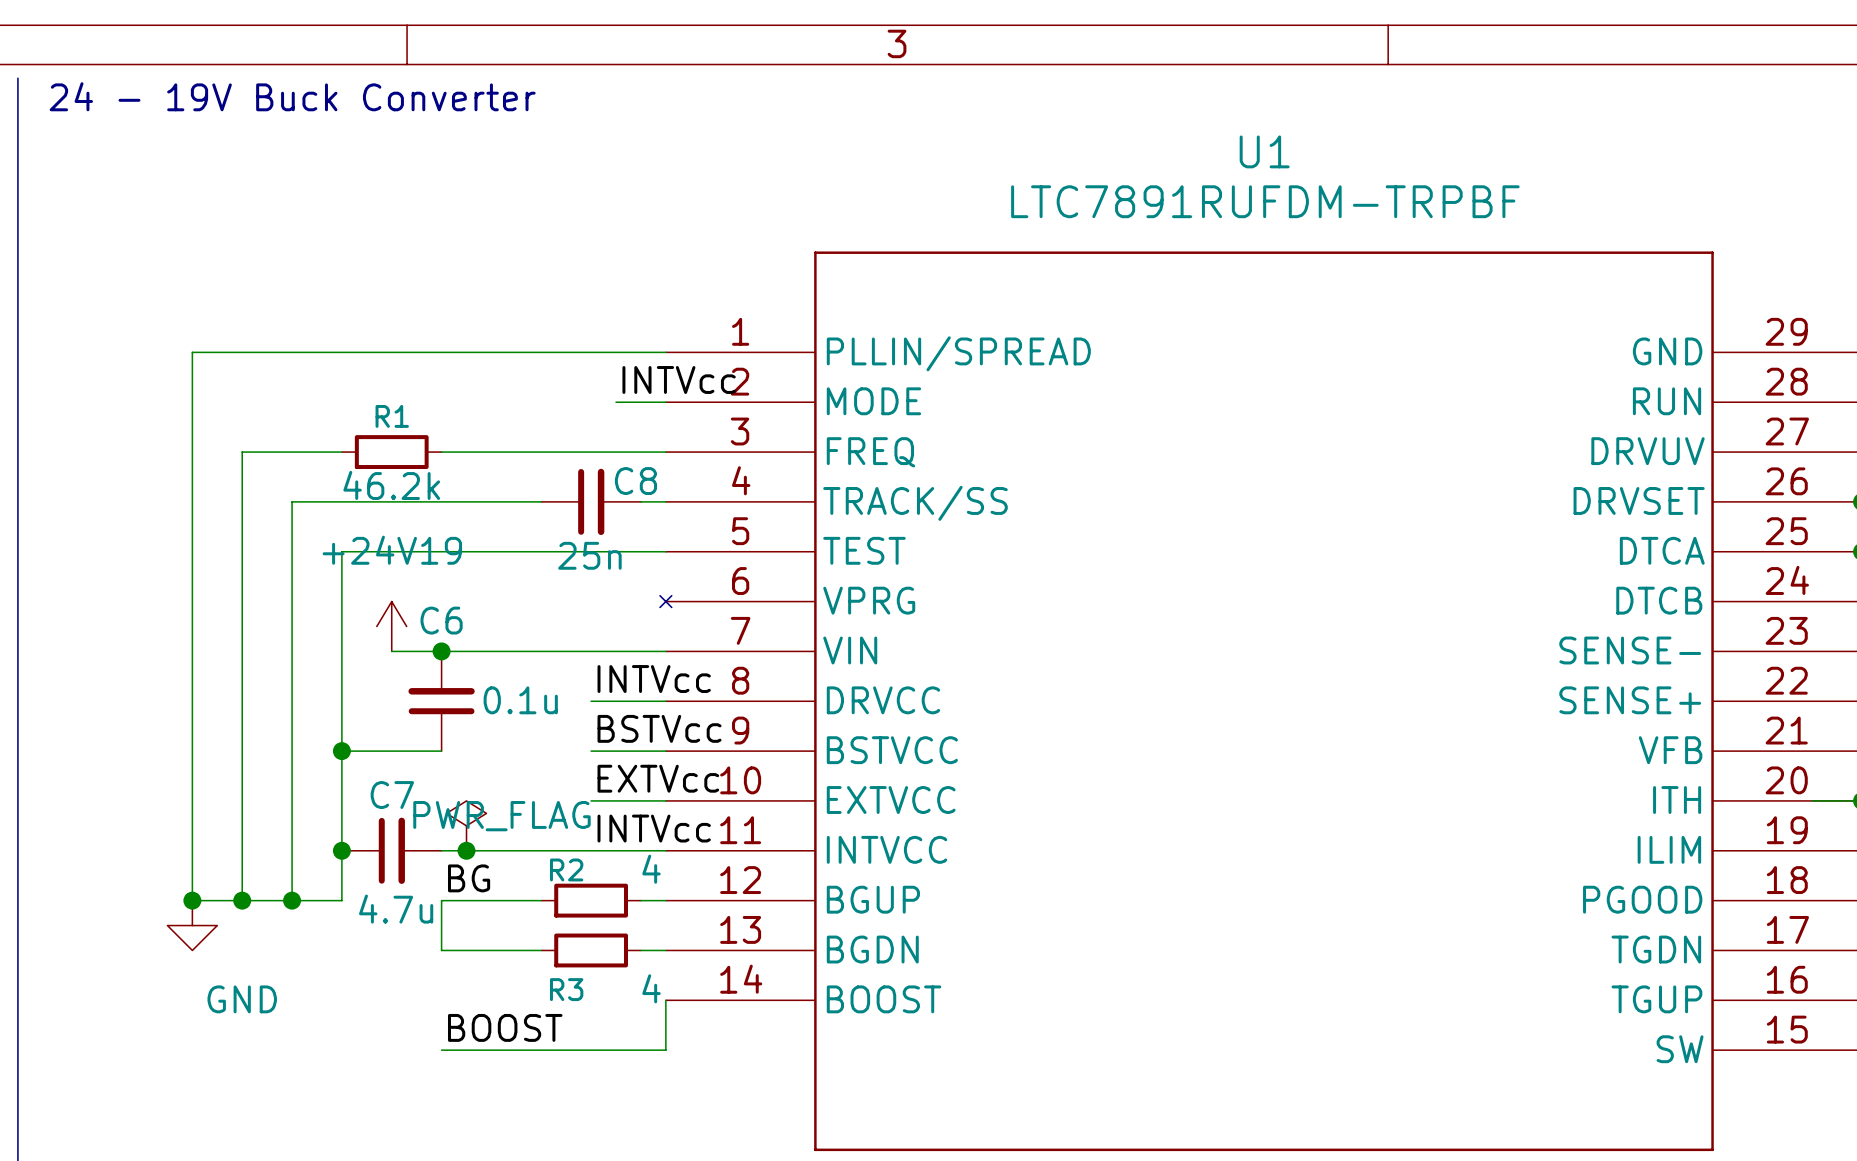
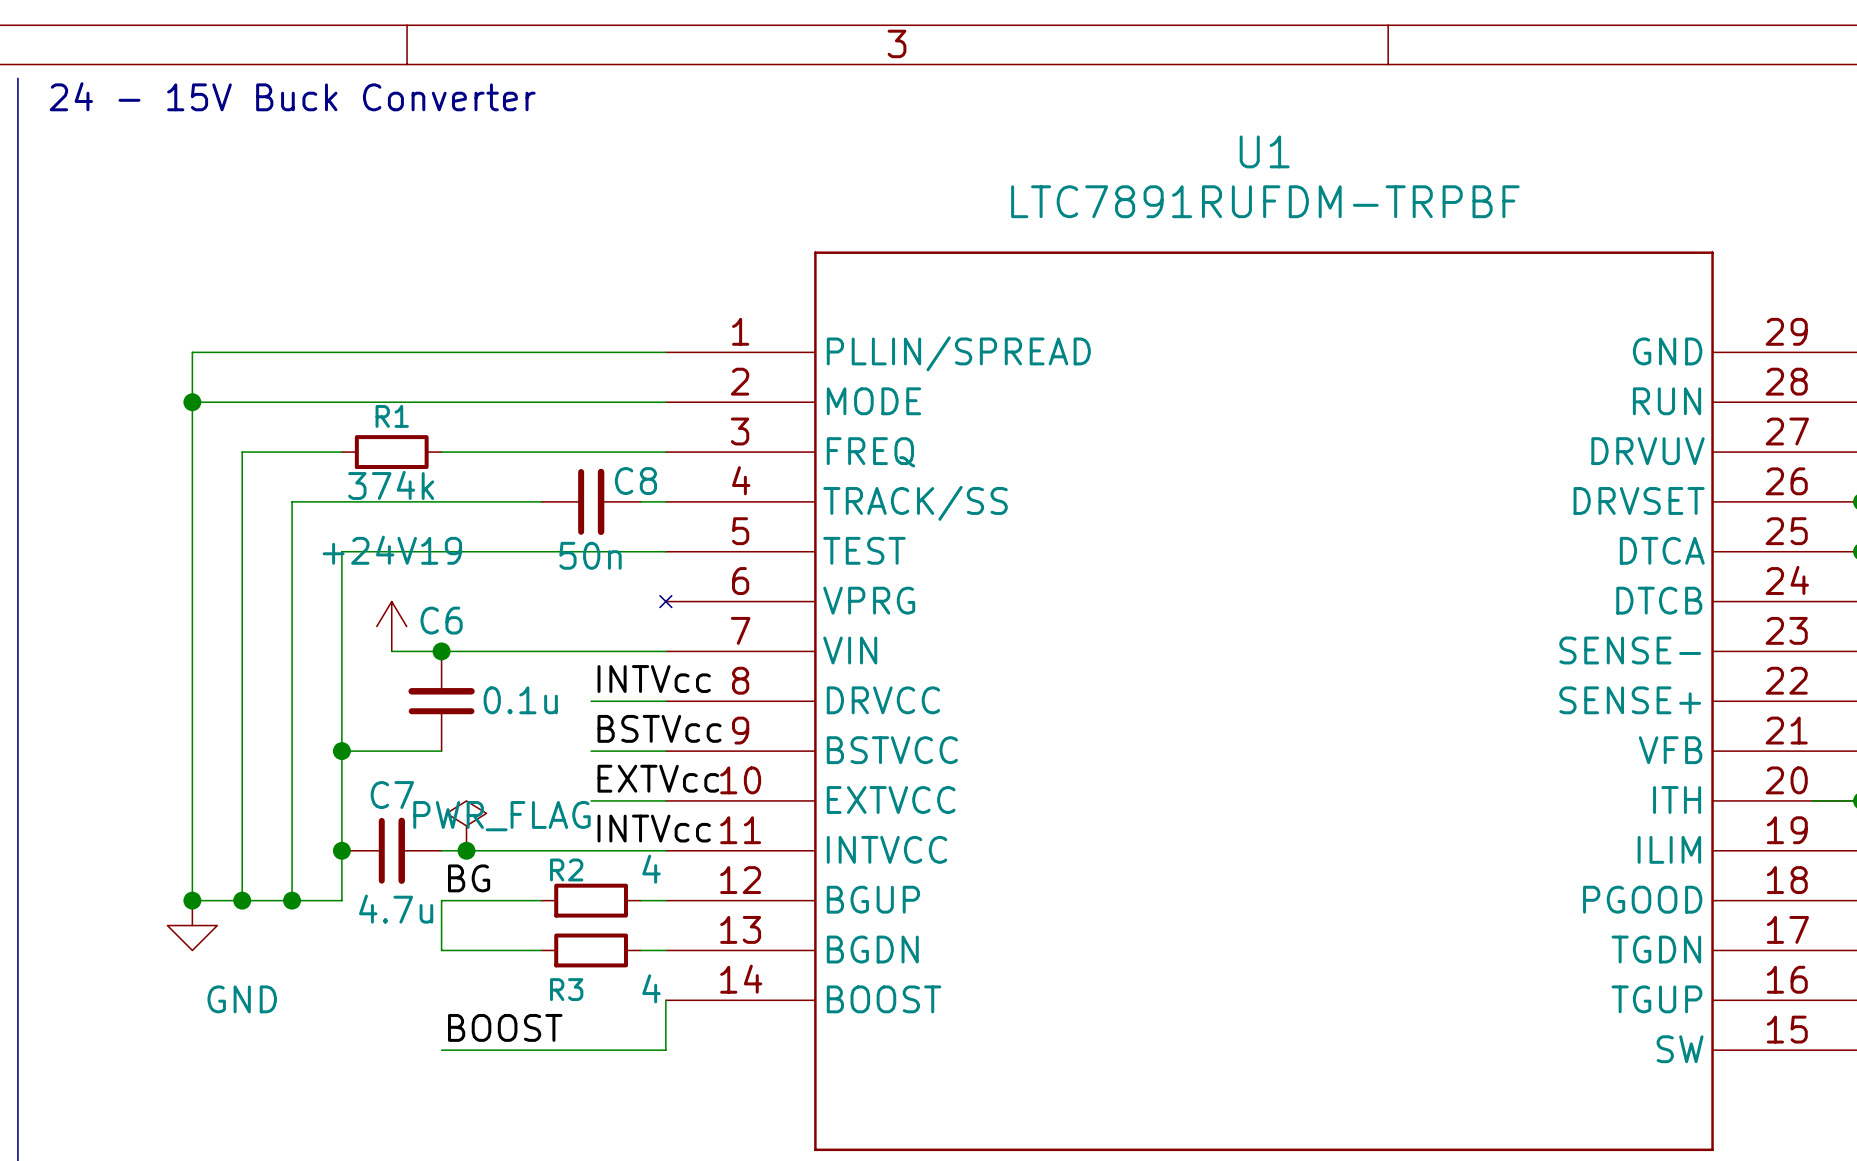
text: 24 - 19V Buck Converter (292, 96) -> 24 - 15V Buck Converter (292, 96)
label: INTVcc (679, 379) -> none
wire: none -> (192, 402) (616, 402)
junction: none -> (192, 402)
R1 value: 46.2k (391, 485) -> 374k (391, 485)
C8 value: 25n (589, 555) -> 50n (590, 555)

